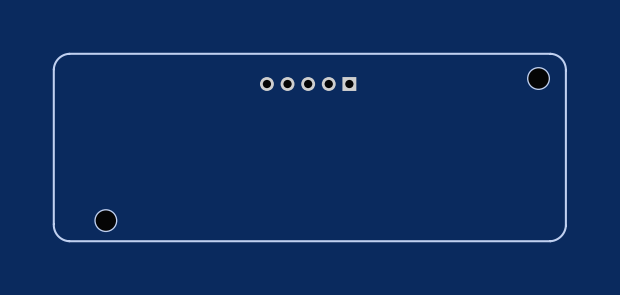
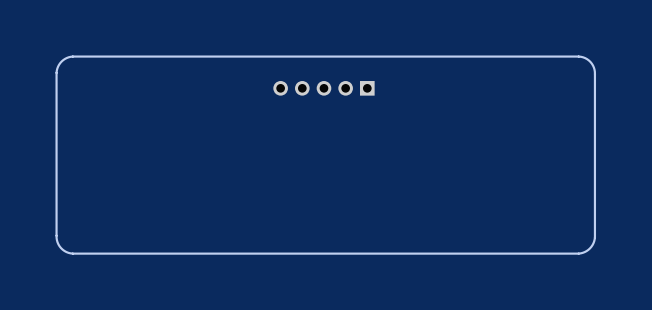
part: (538, 78) -> none
part: (105, 220) -> none

